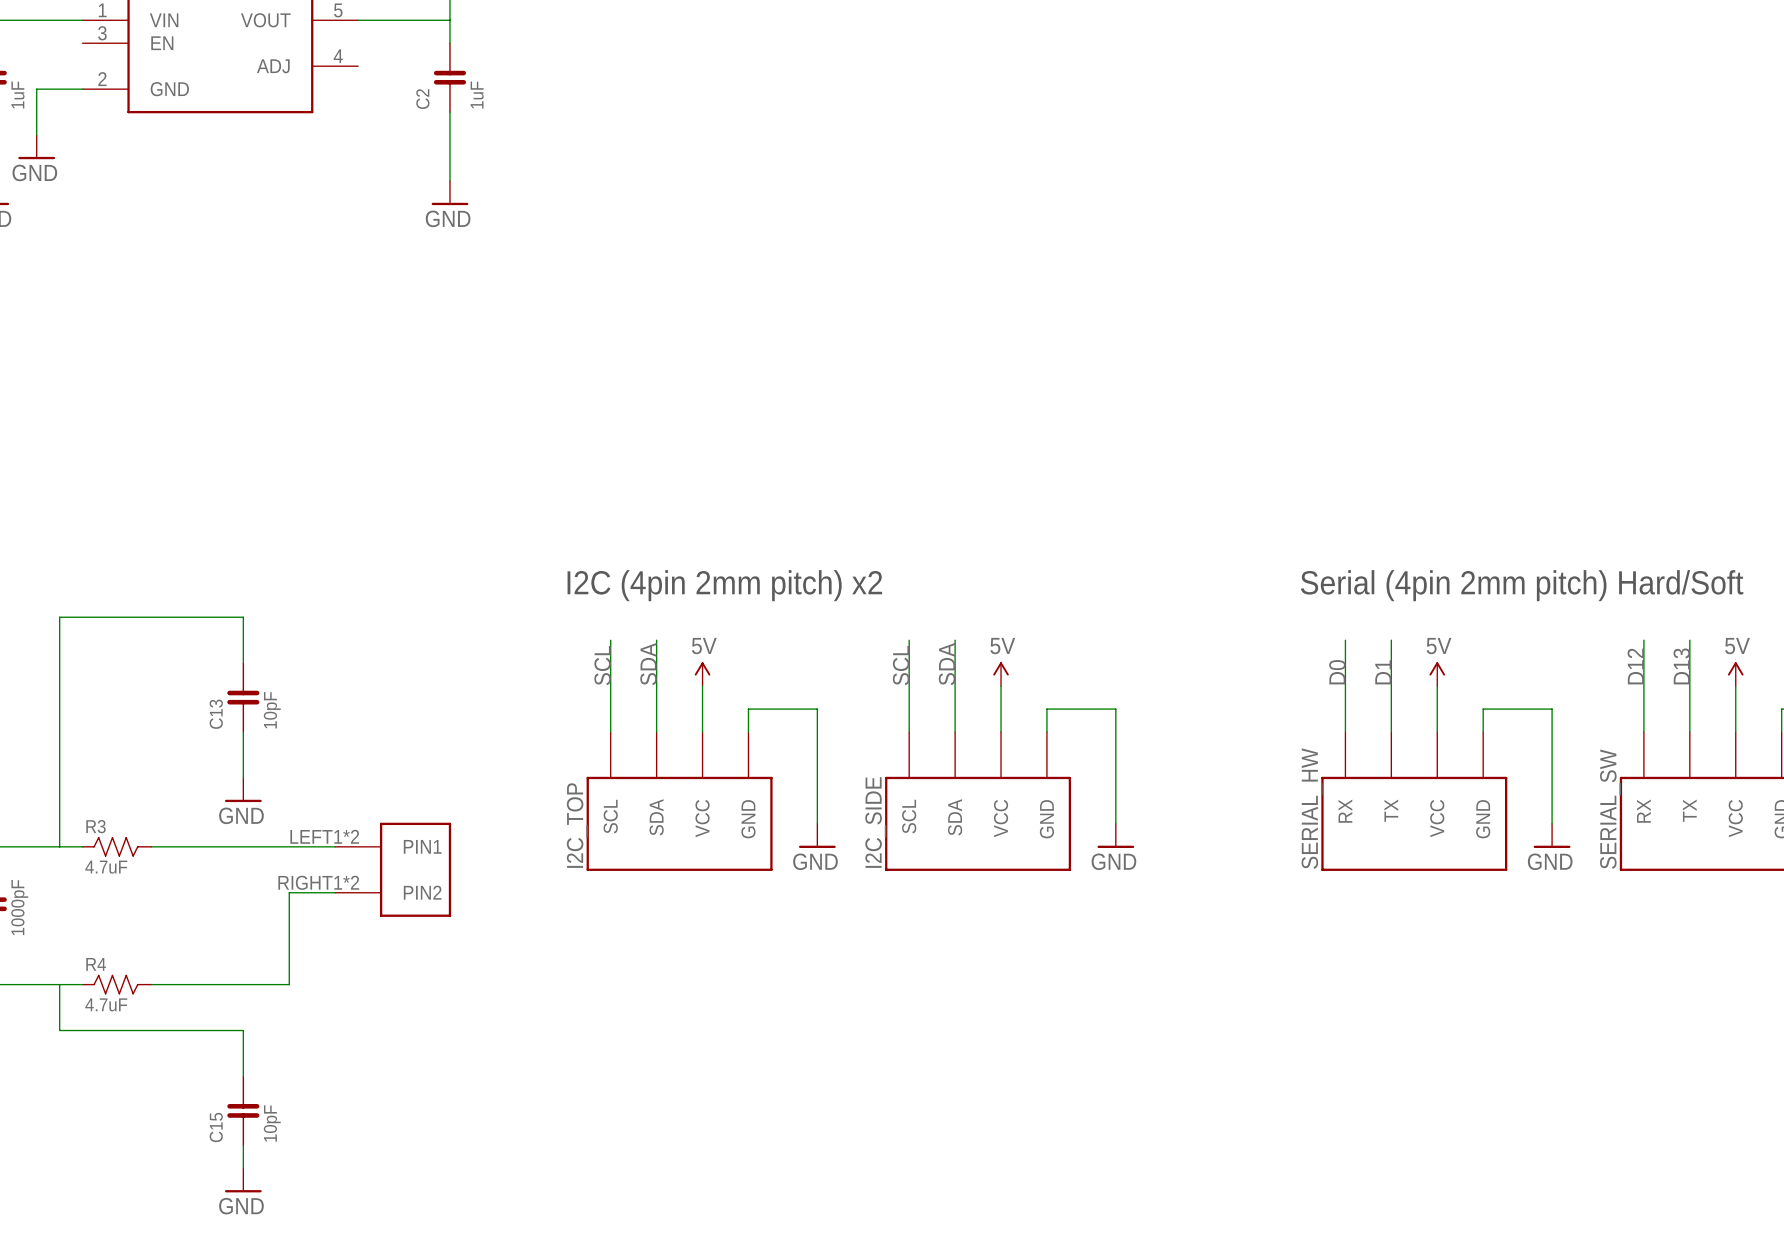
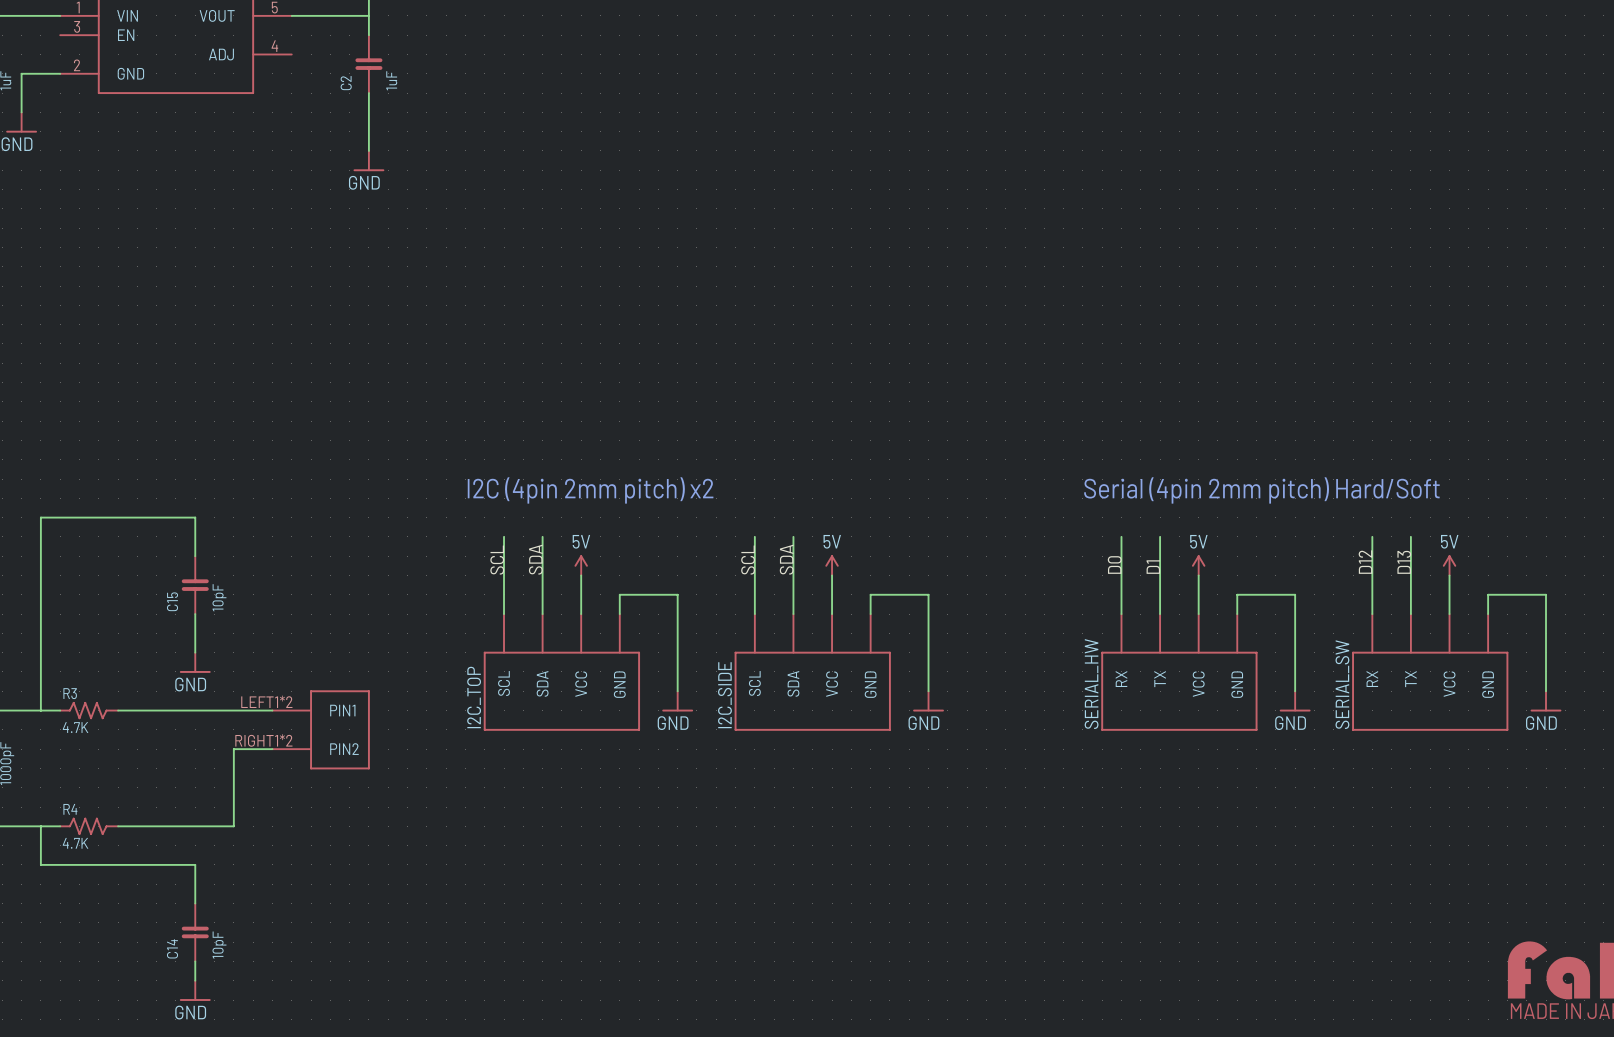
C13 name: C13 (216, 714) -> C15 (172, 601)
R3 value: 4.7uF (106, 867) -> 4.7K (75, 727)
R4 value: 4.7uF (106, 1004) -> 4.7K (75, 843)
C15 name: C15 (216, 1127) -> C14 (172, 948)

